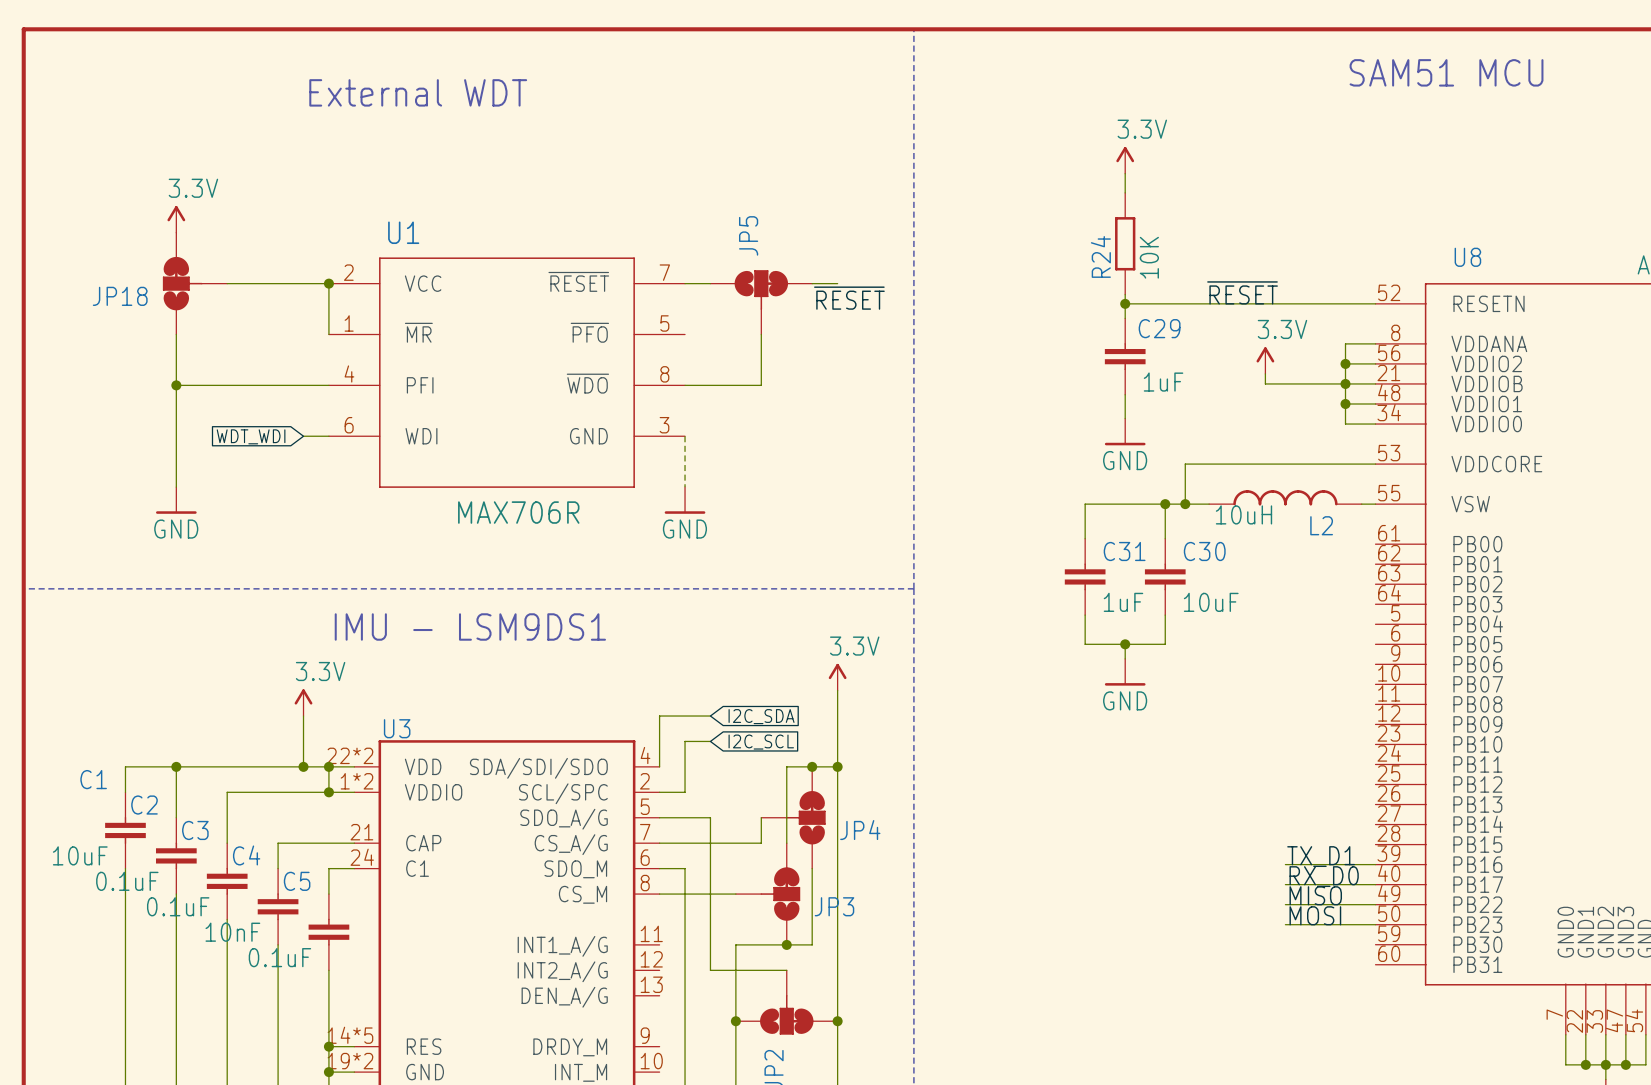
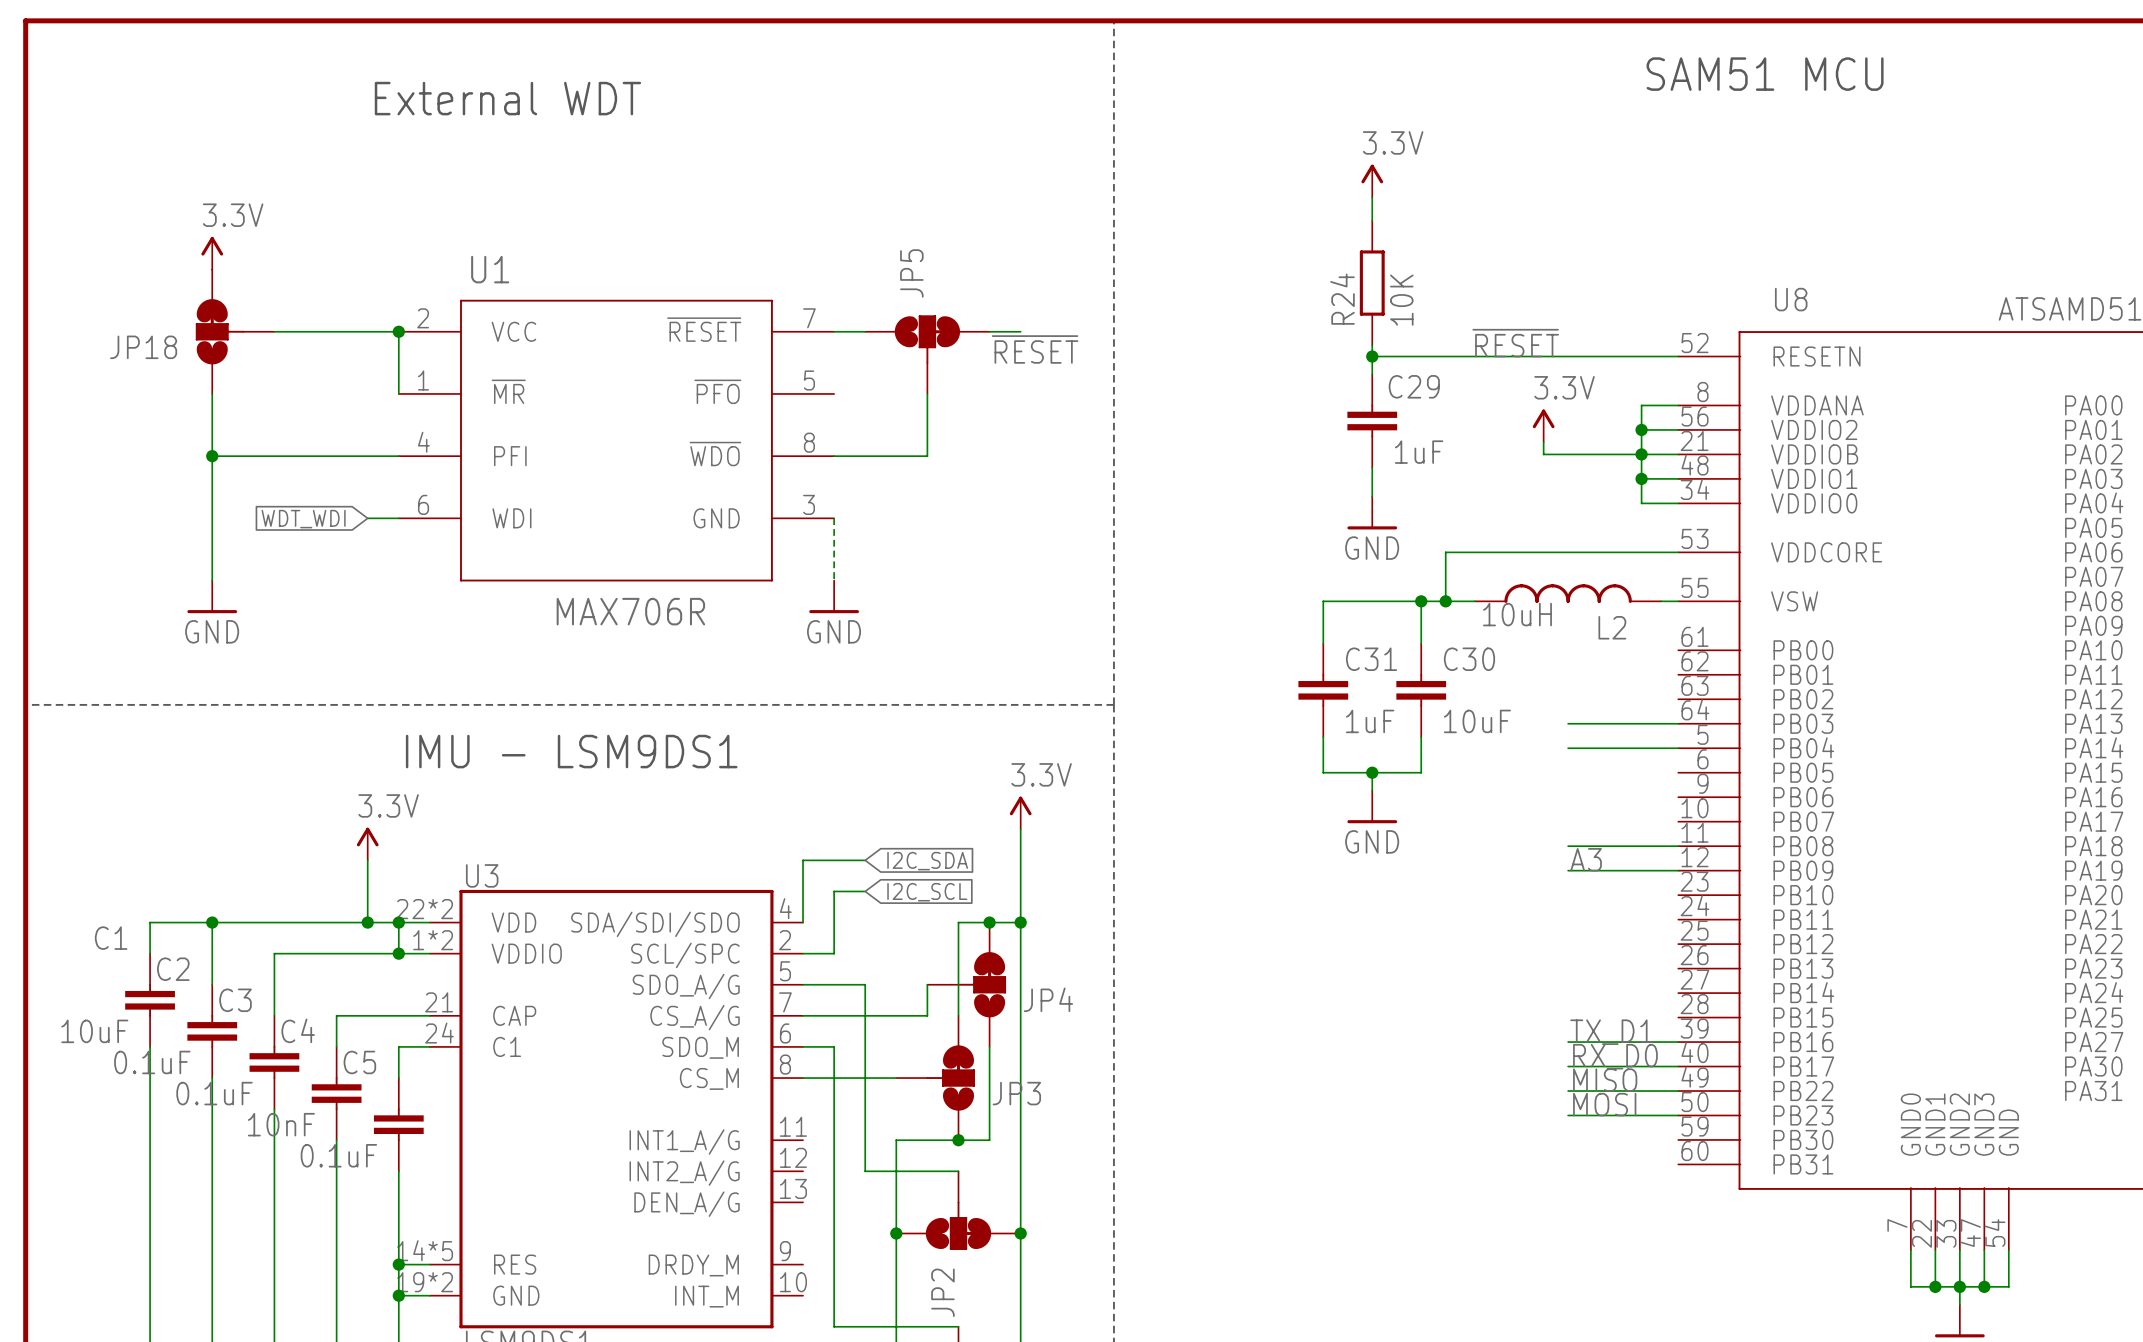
wire: none -> (1568, 723) (1678, 723)
wire: none -> (1568, 748) (1678, 748)
wire: none -> (1568, 846) (1678, 846)
label: none -> A3 (1586, 859)
wire: none -> (1568, 870) (1678, 870)

